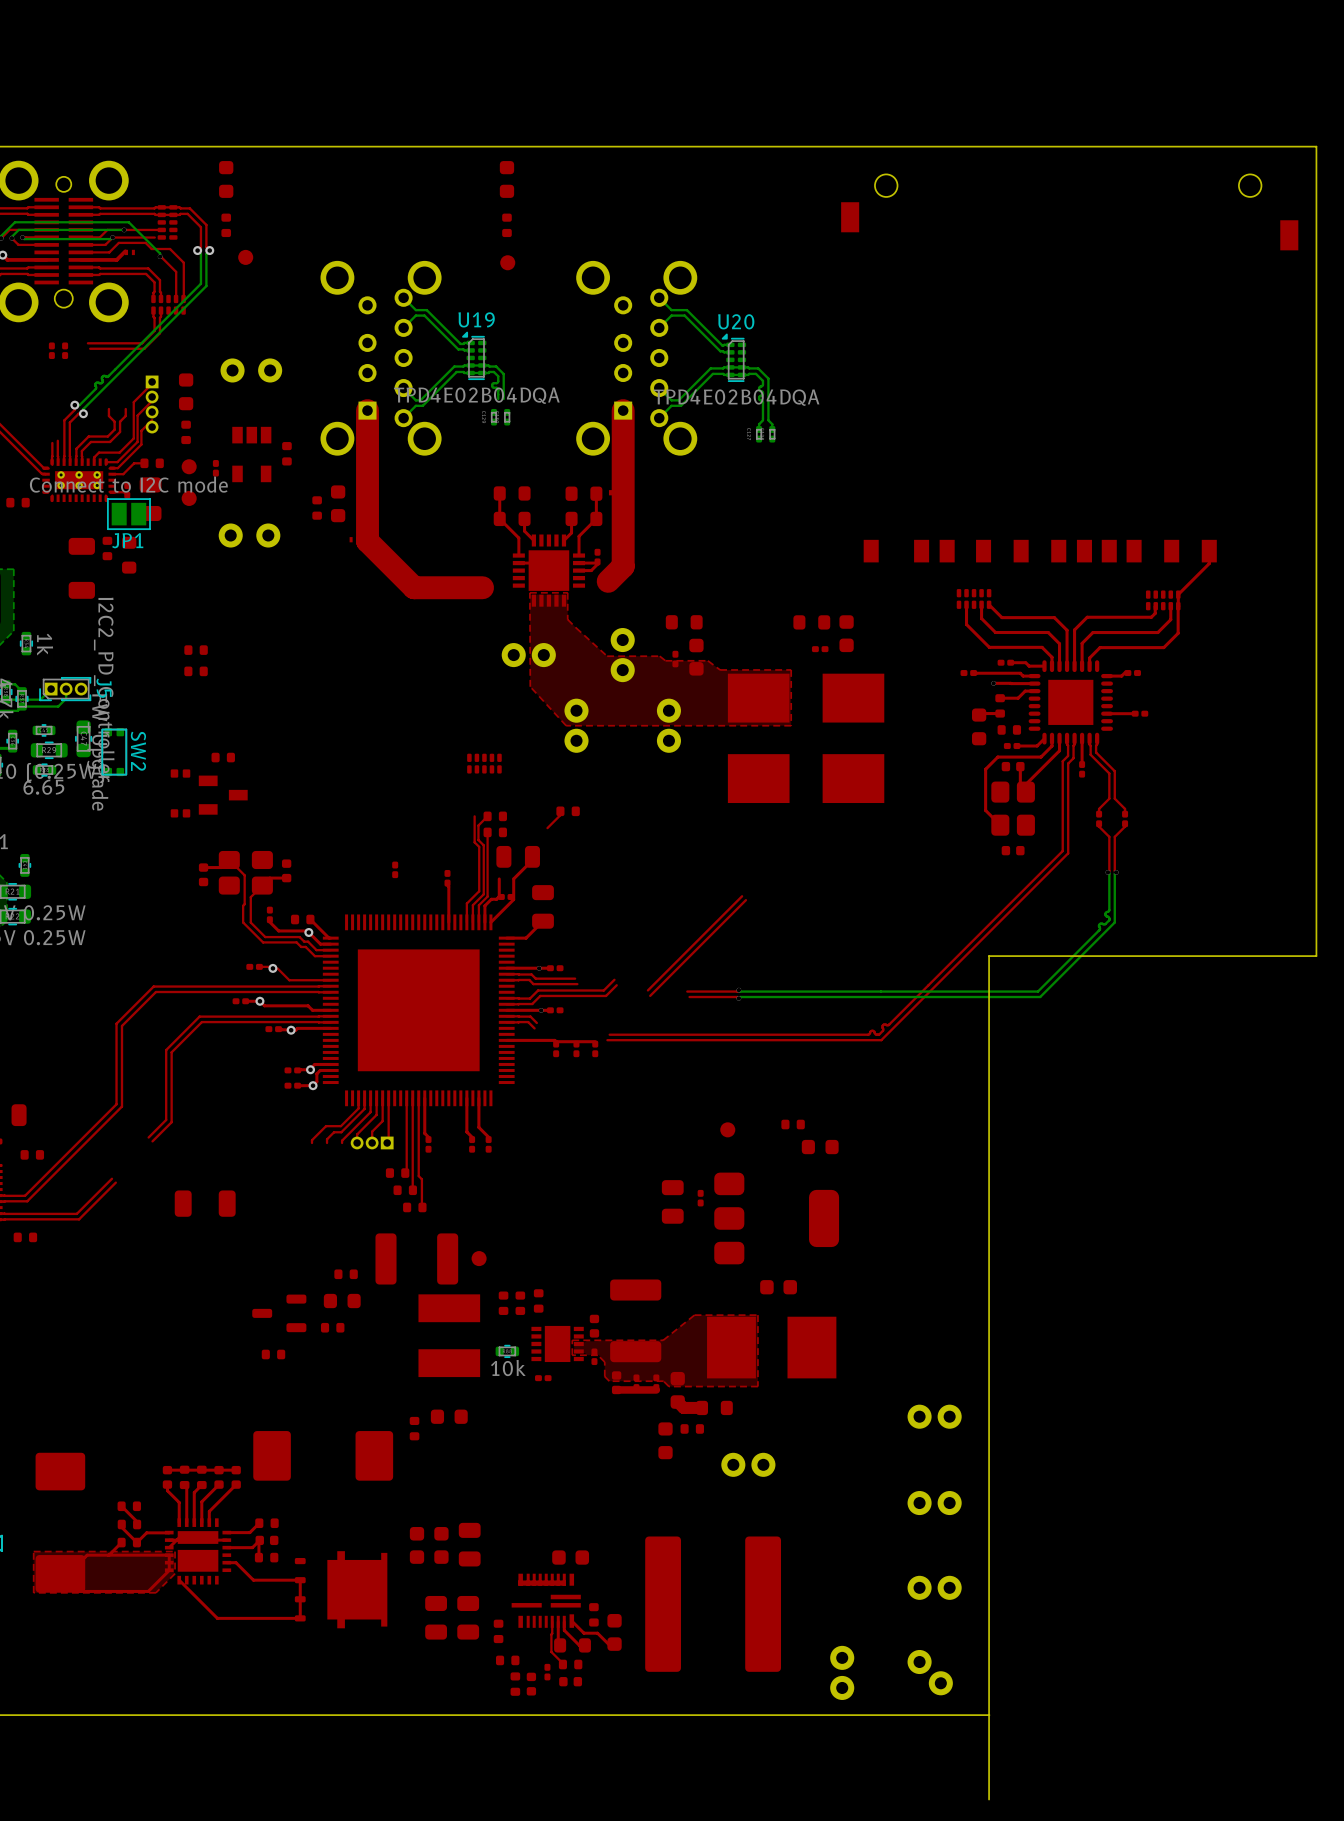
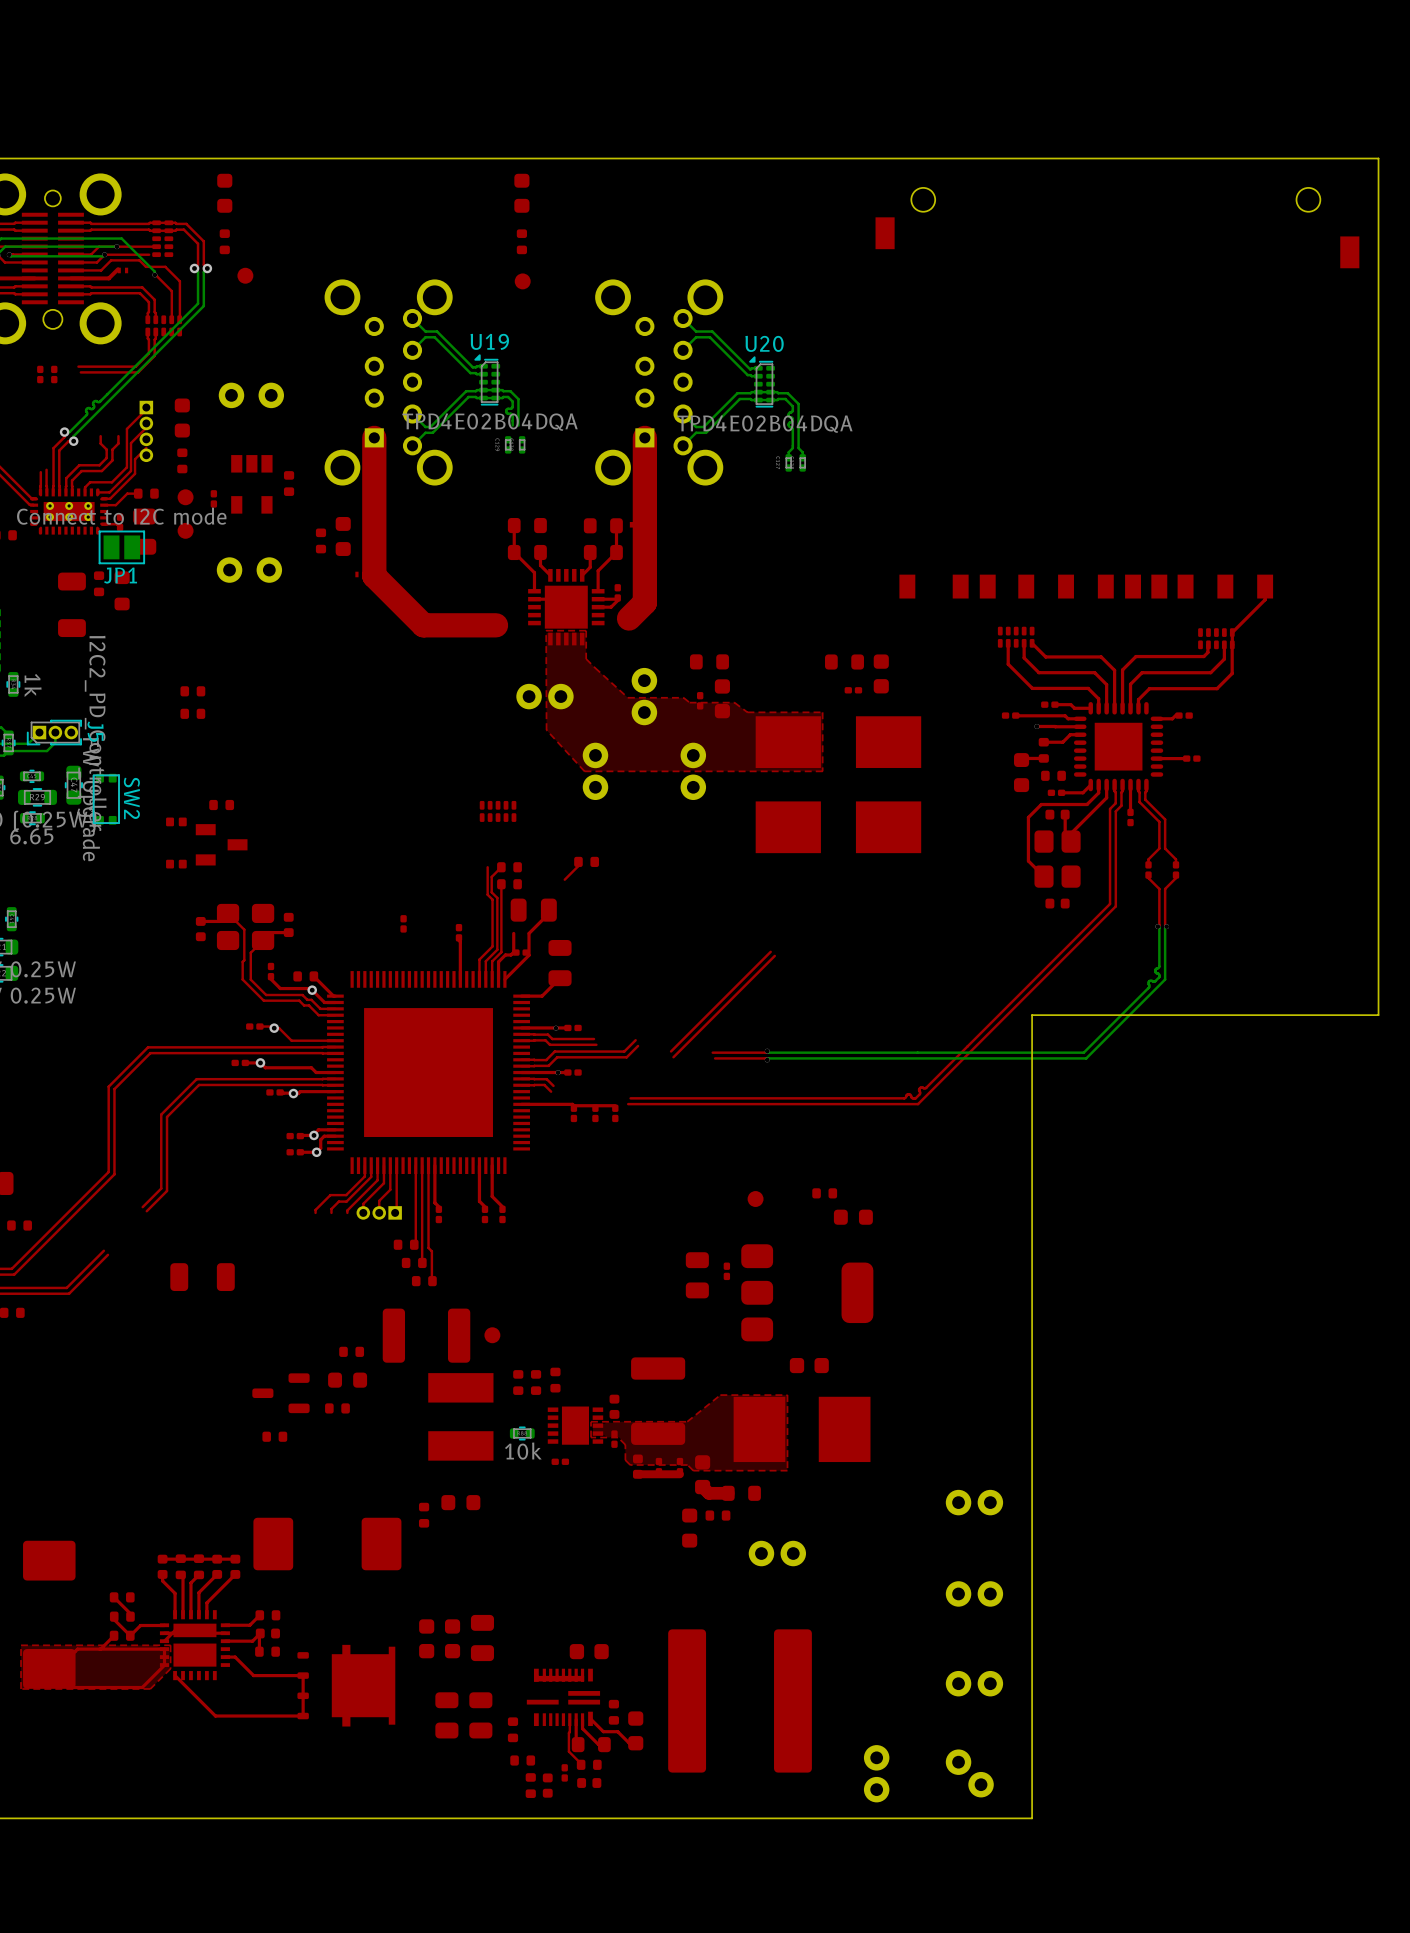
board edge: (989, 1715) (989, 1799) -> none

